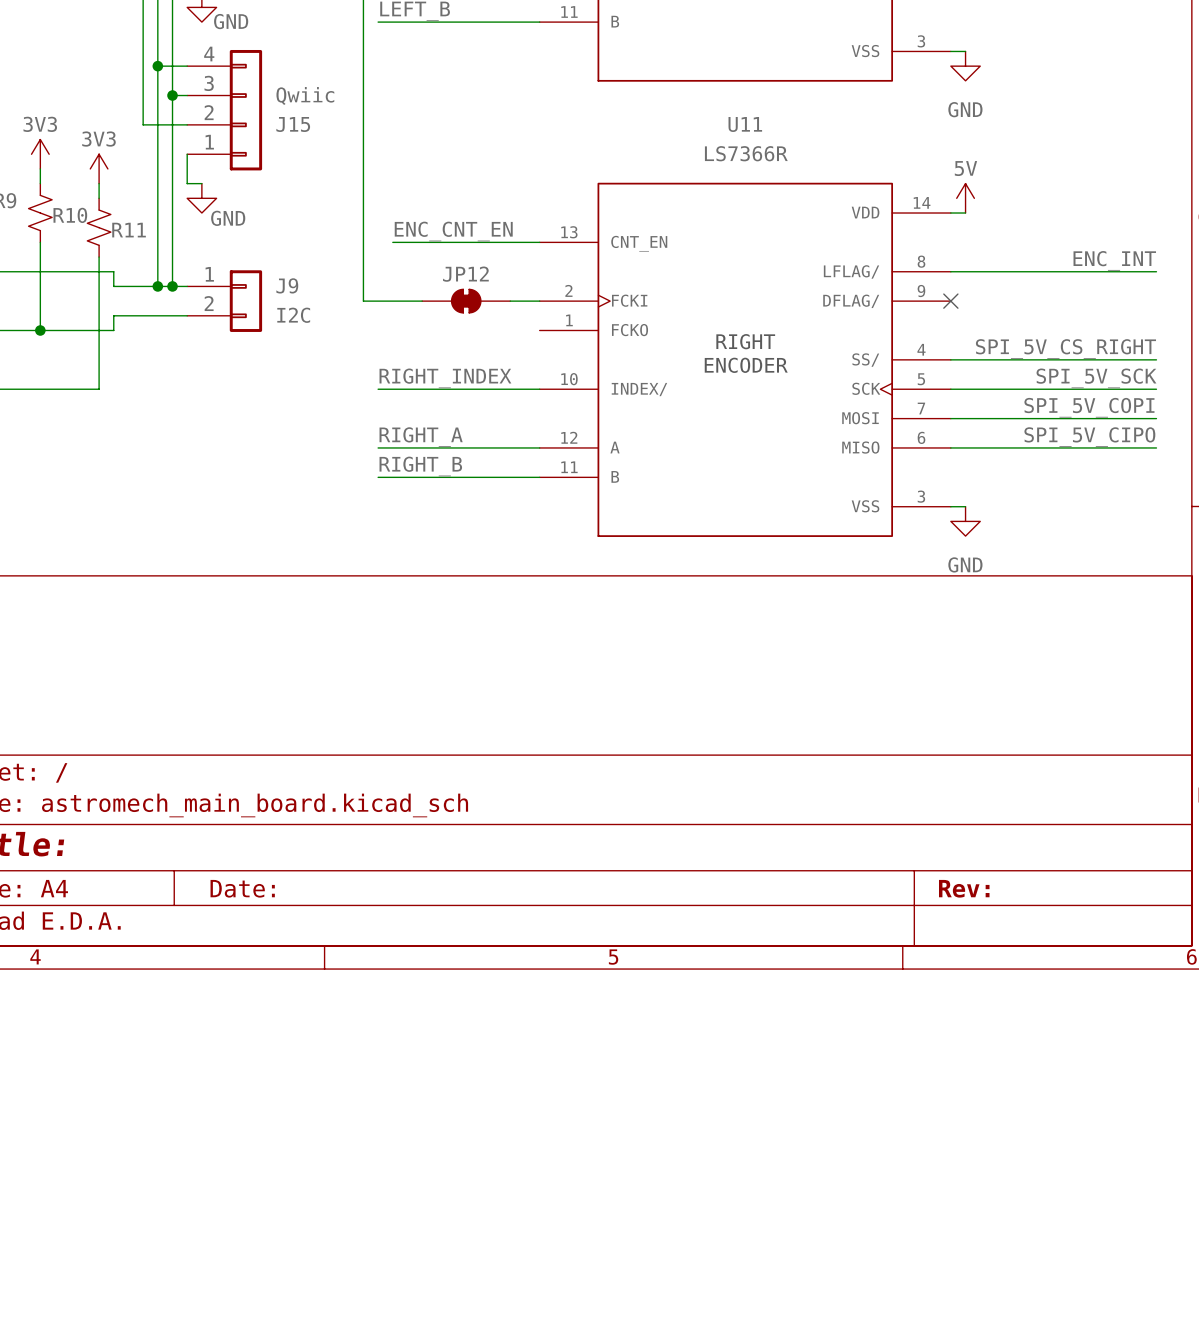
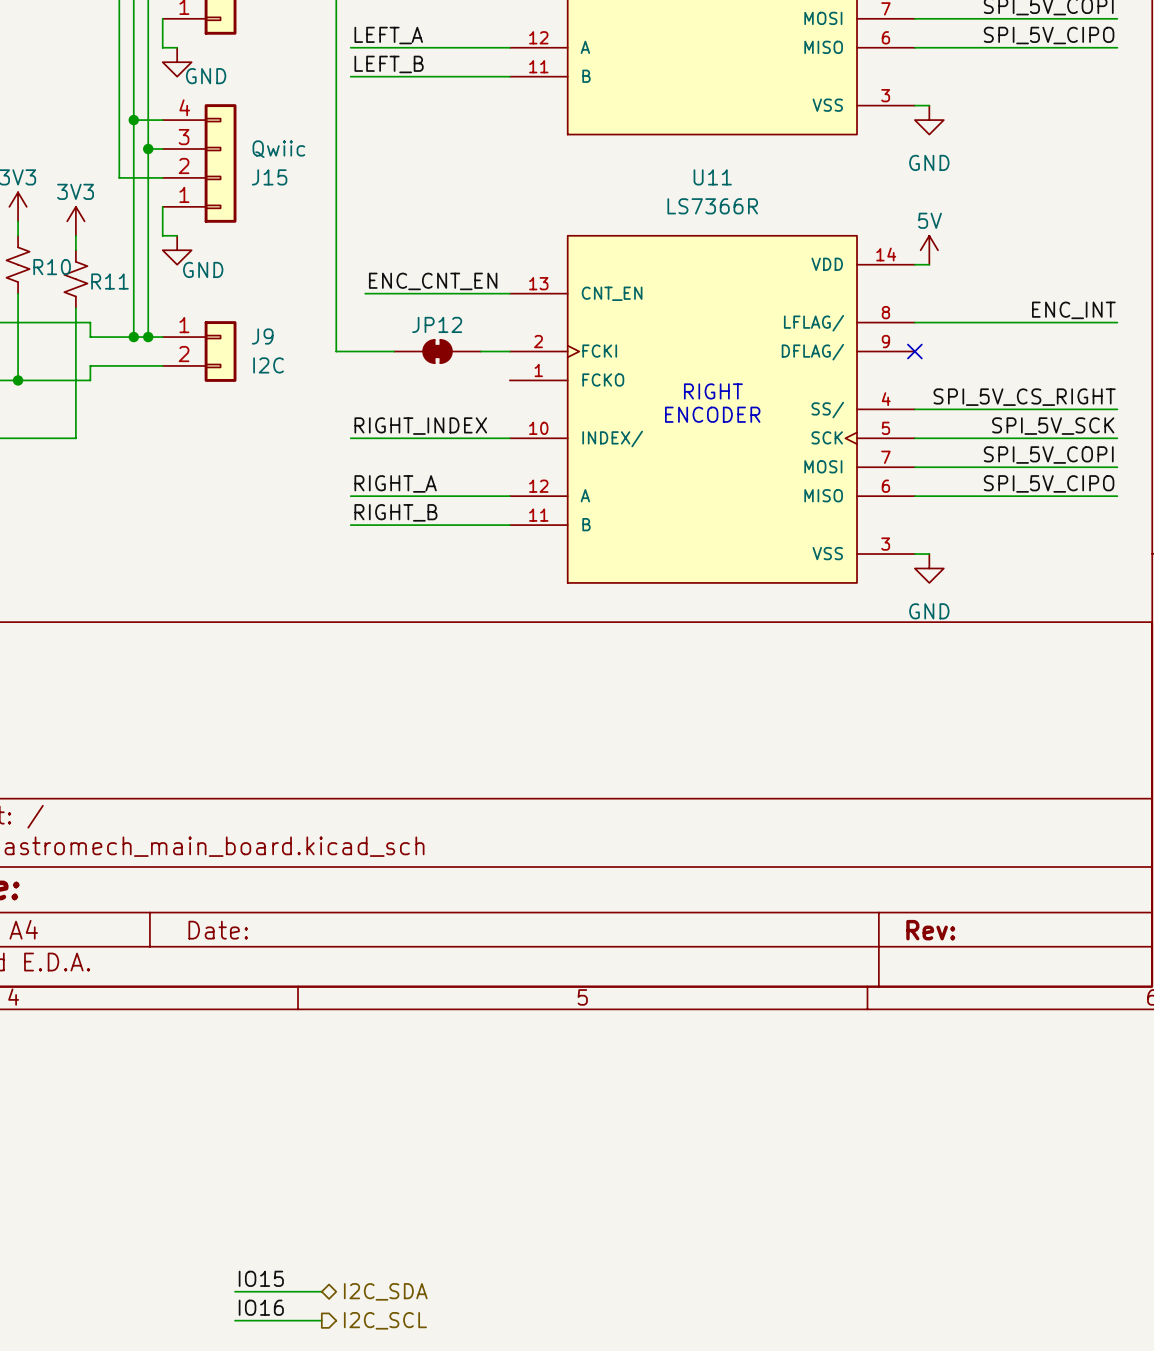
label: none -> IO15 (261, 1278)
wire: none -> (235, 1291) (321, 1291)
hierarchical label: none -> I2C_SDA (385, 1291)
label: none -> IO16 (261, 1307)
wire: none -> (235, 1320) (321, 1320)
hierarchical label: none -> I2C_SCL (385, 1320)

